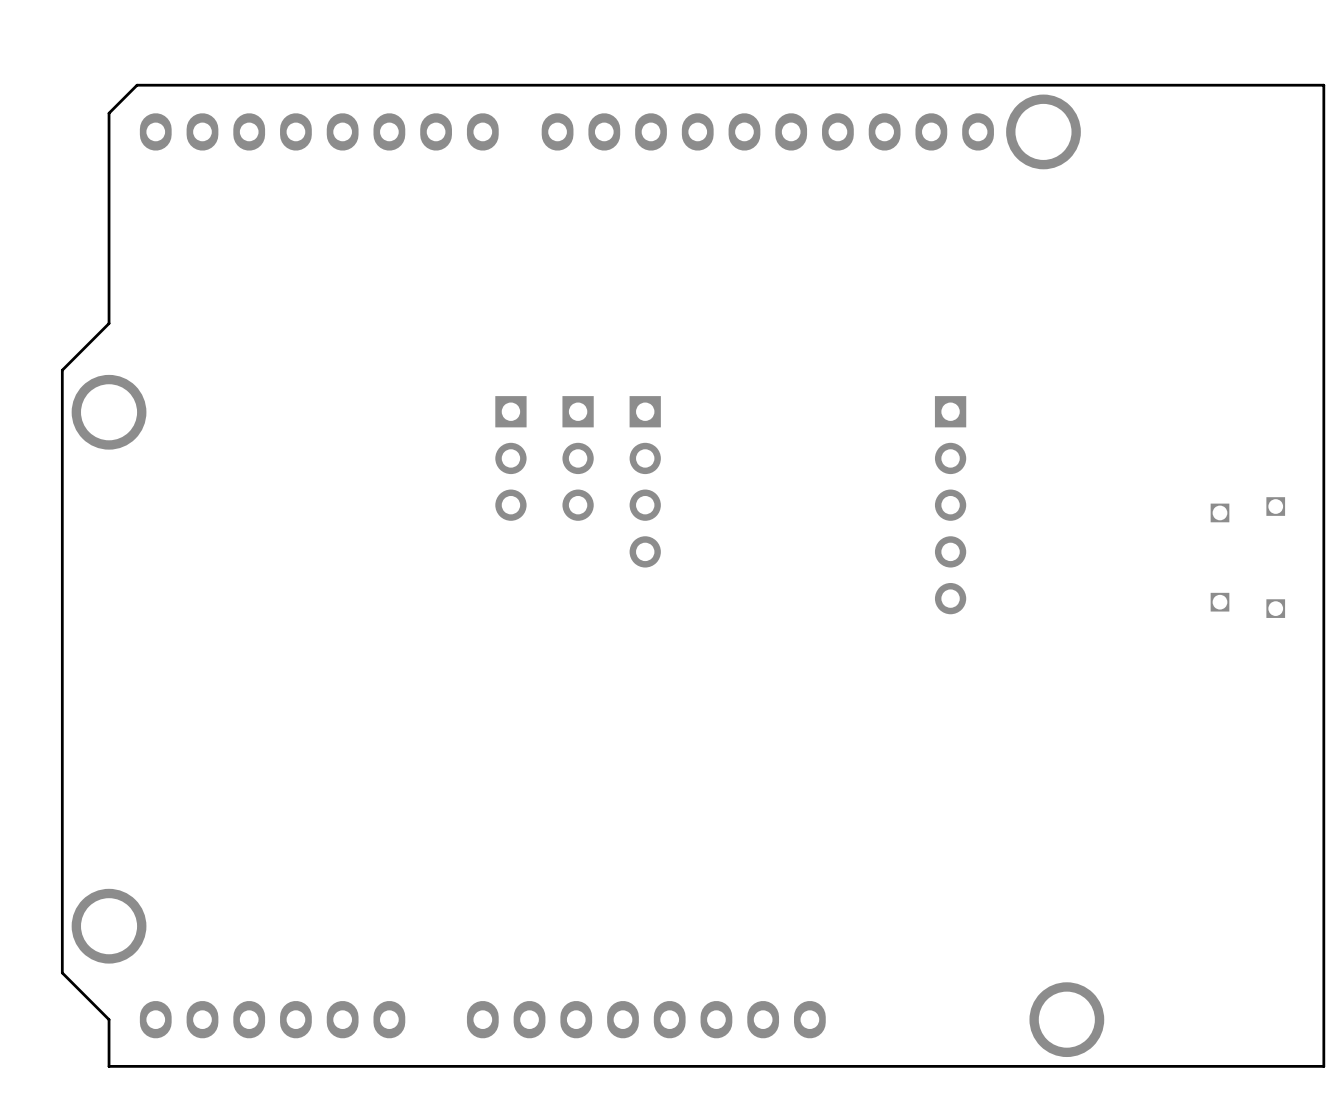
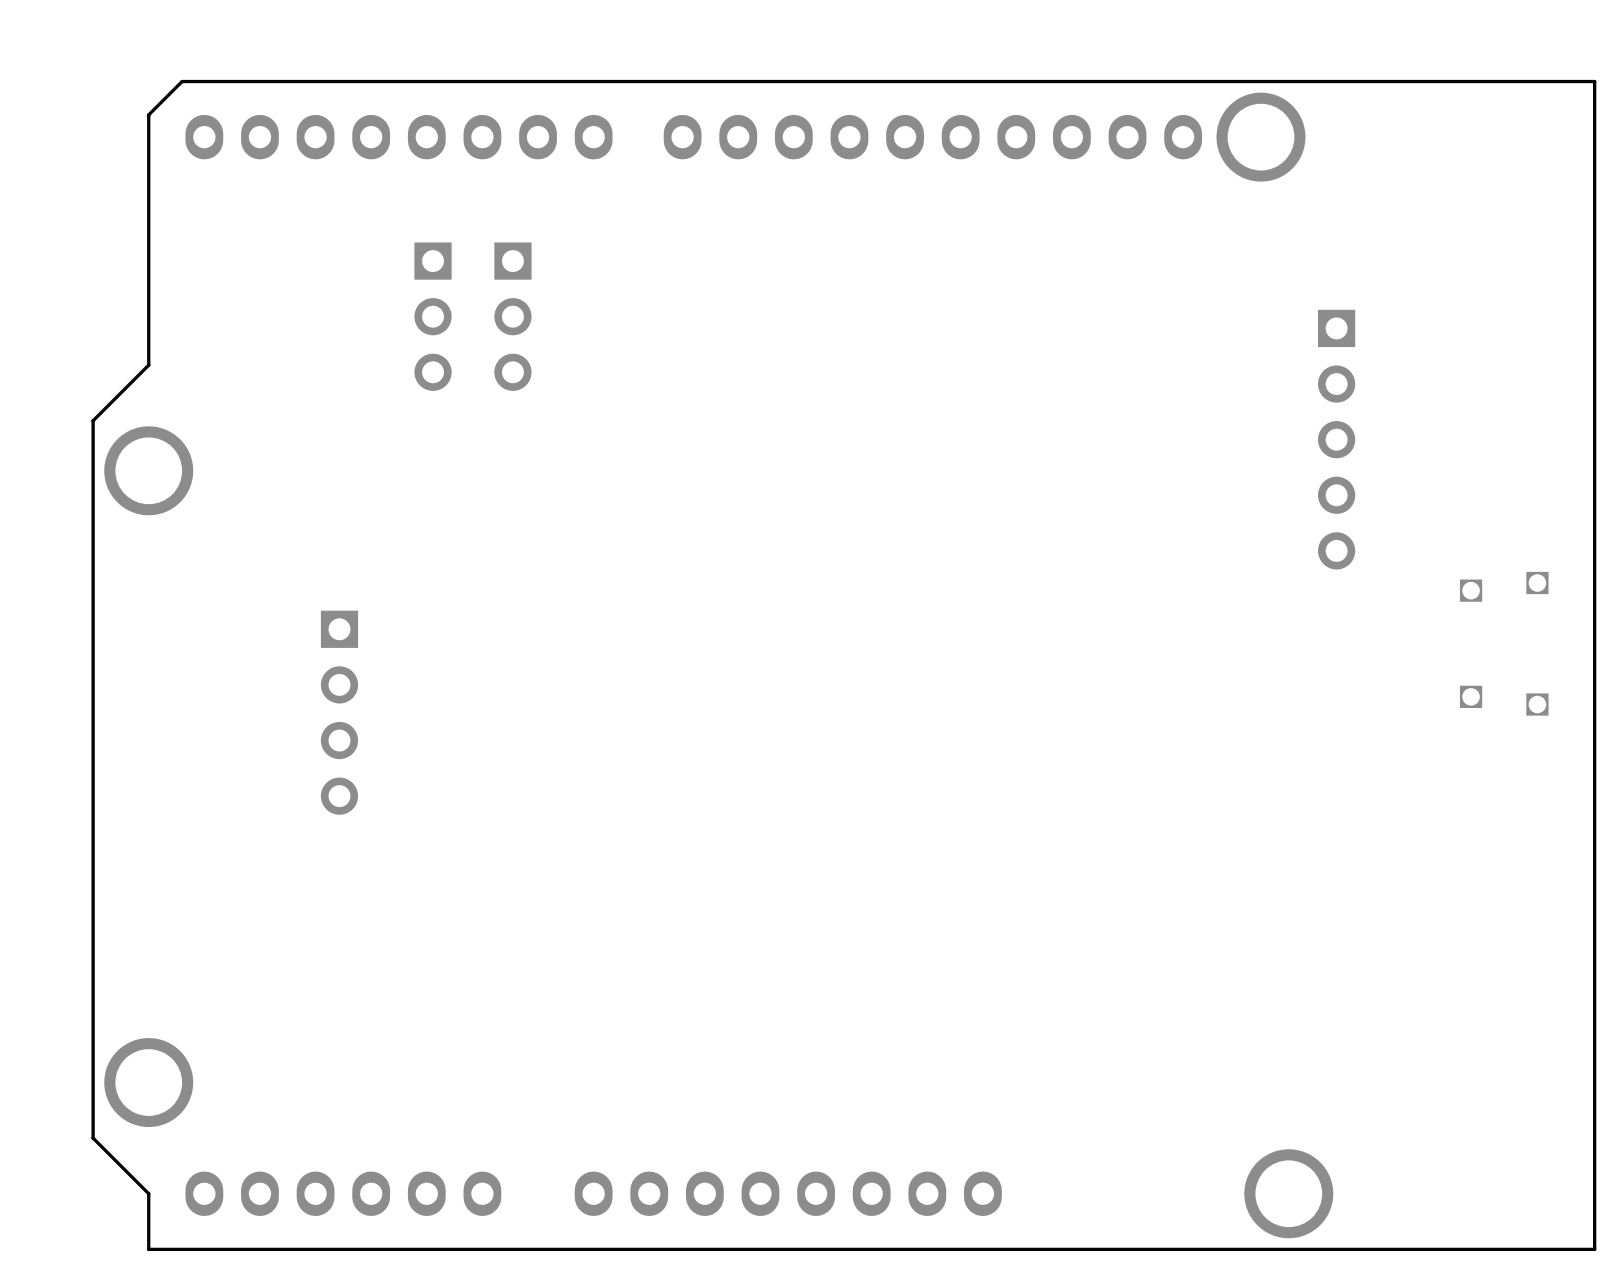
part: none -> (433, 316)
part: none -> (512, 316)
part: (510, 458) -> none
part: (578, 458) -> none
part position: (645, 481) -> (339, 712)
part position: (950, 505) -> (1336, 439)

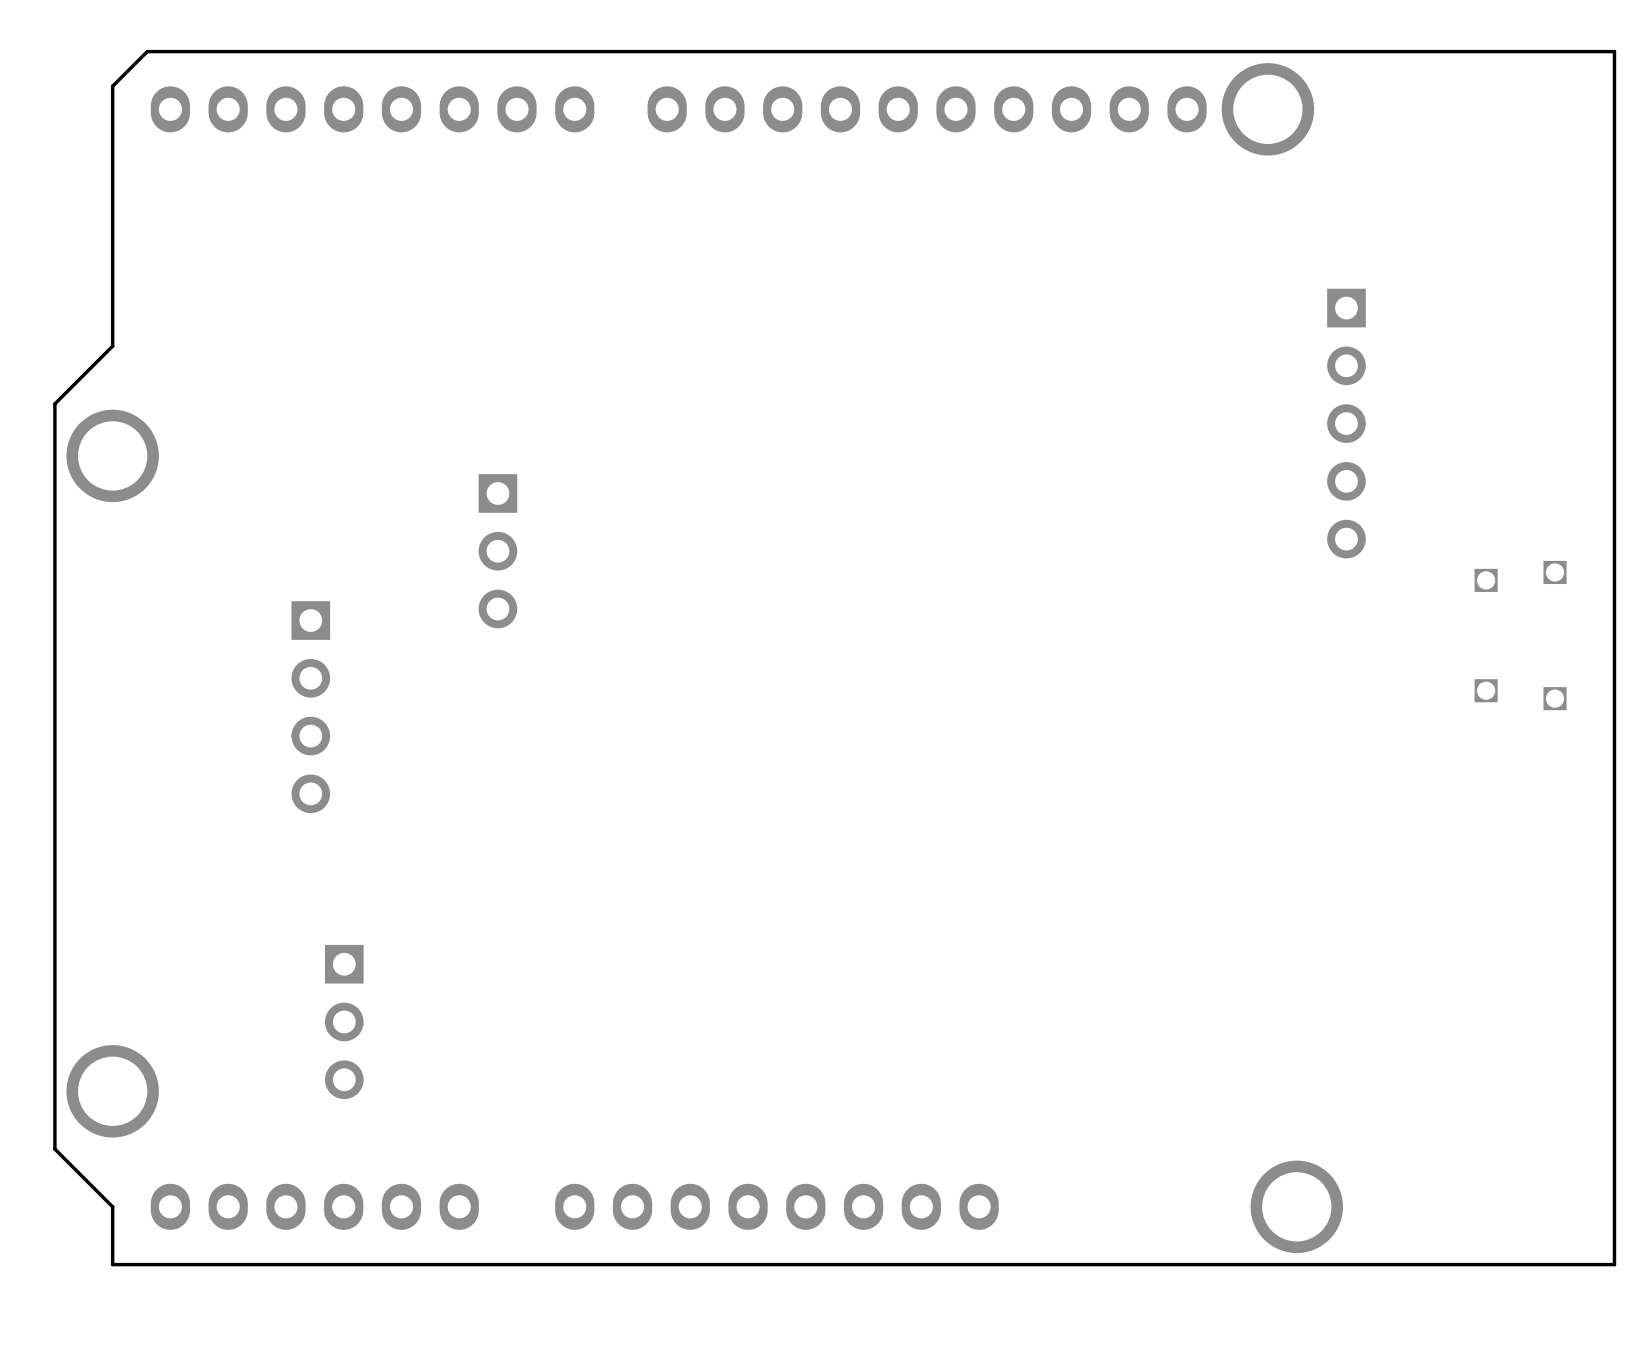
part: (433, 316) -> none
part: (512, 316) -> none
part: none -> (497, 551)
part: none -> (344, 1021)

